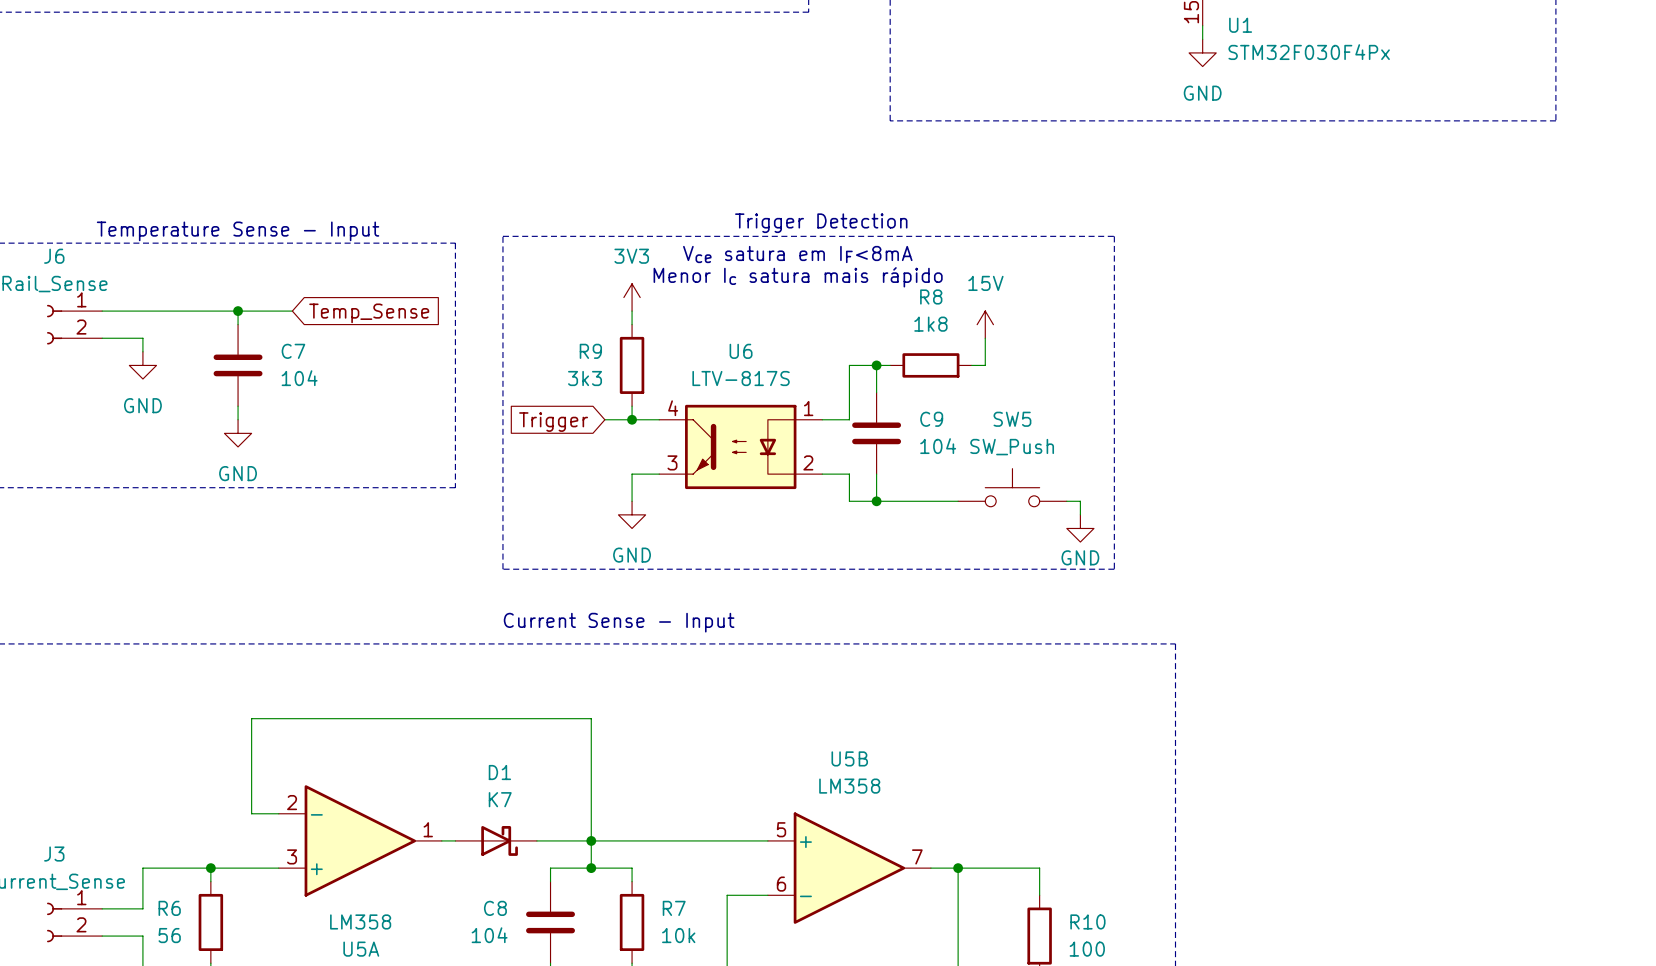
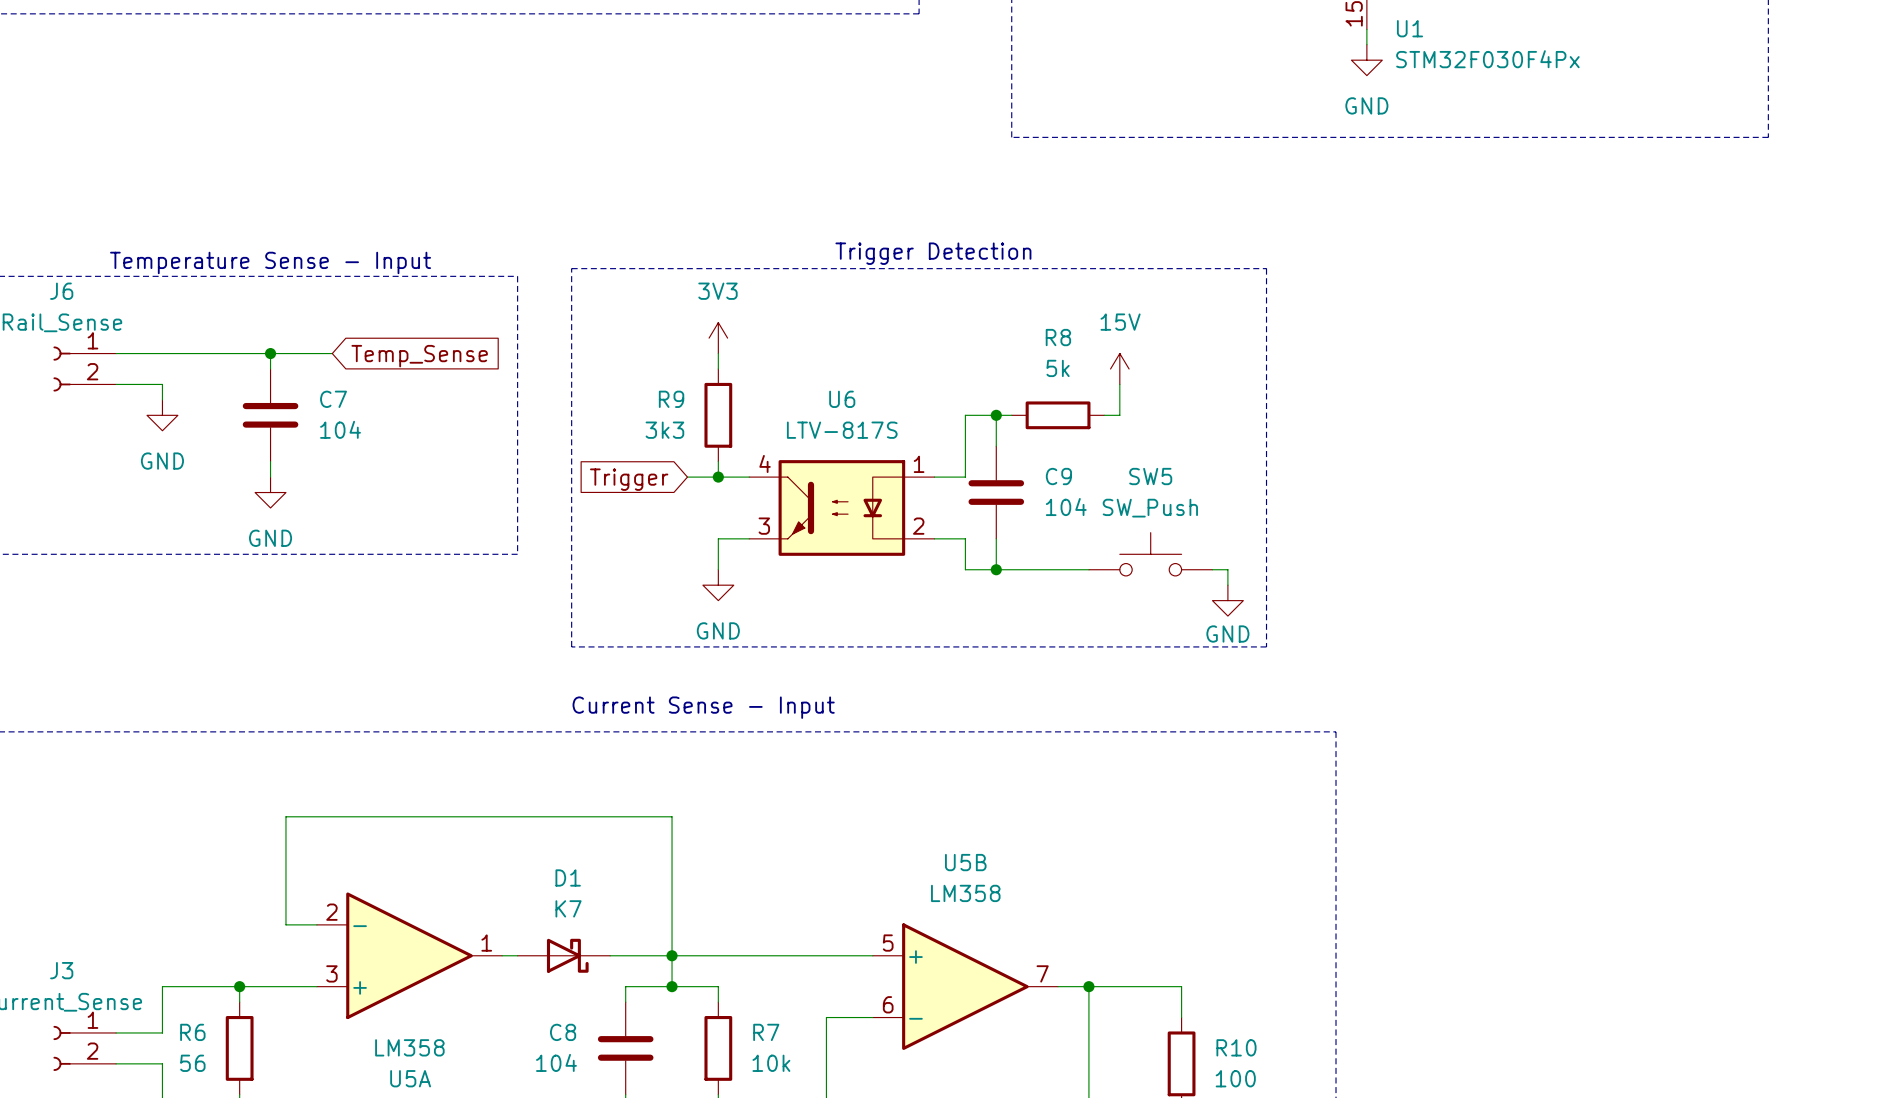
text: Vce satura em IF<8mA (797, 254) -> none
text: Menor Ic satura mais rápido (798, 277) -> none
R8 value: 1k8 (930, 324) -> 5k (1058, 368)

